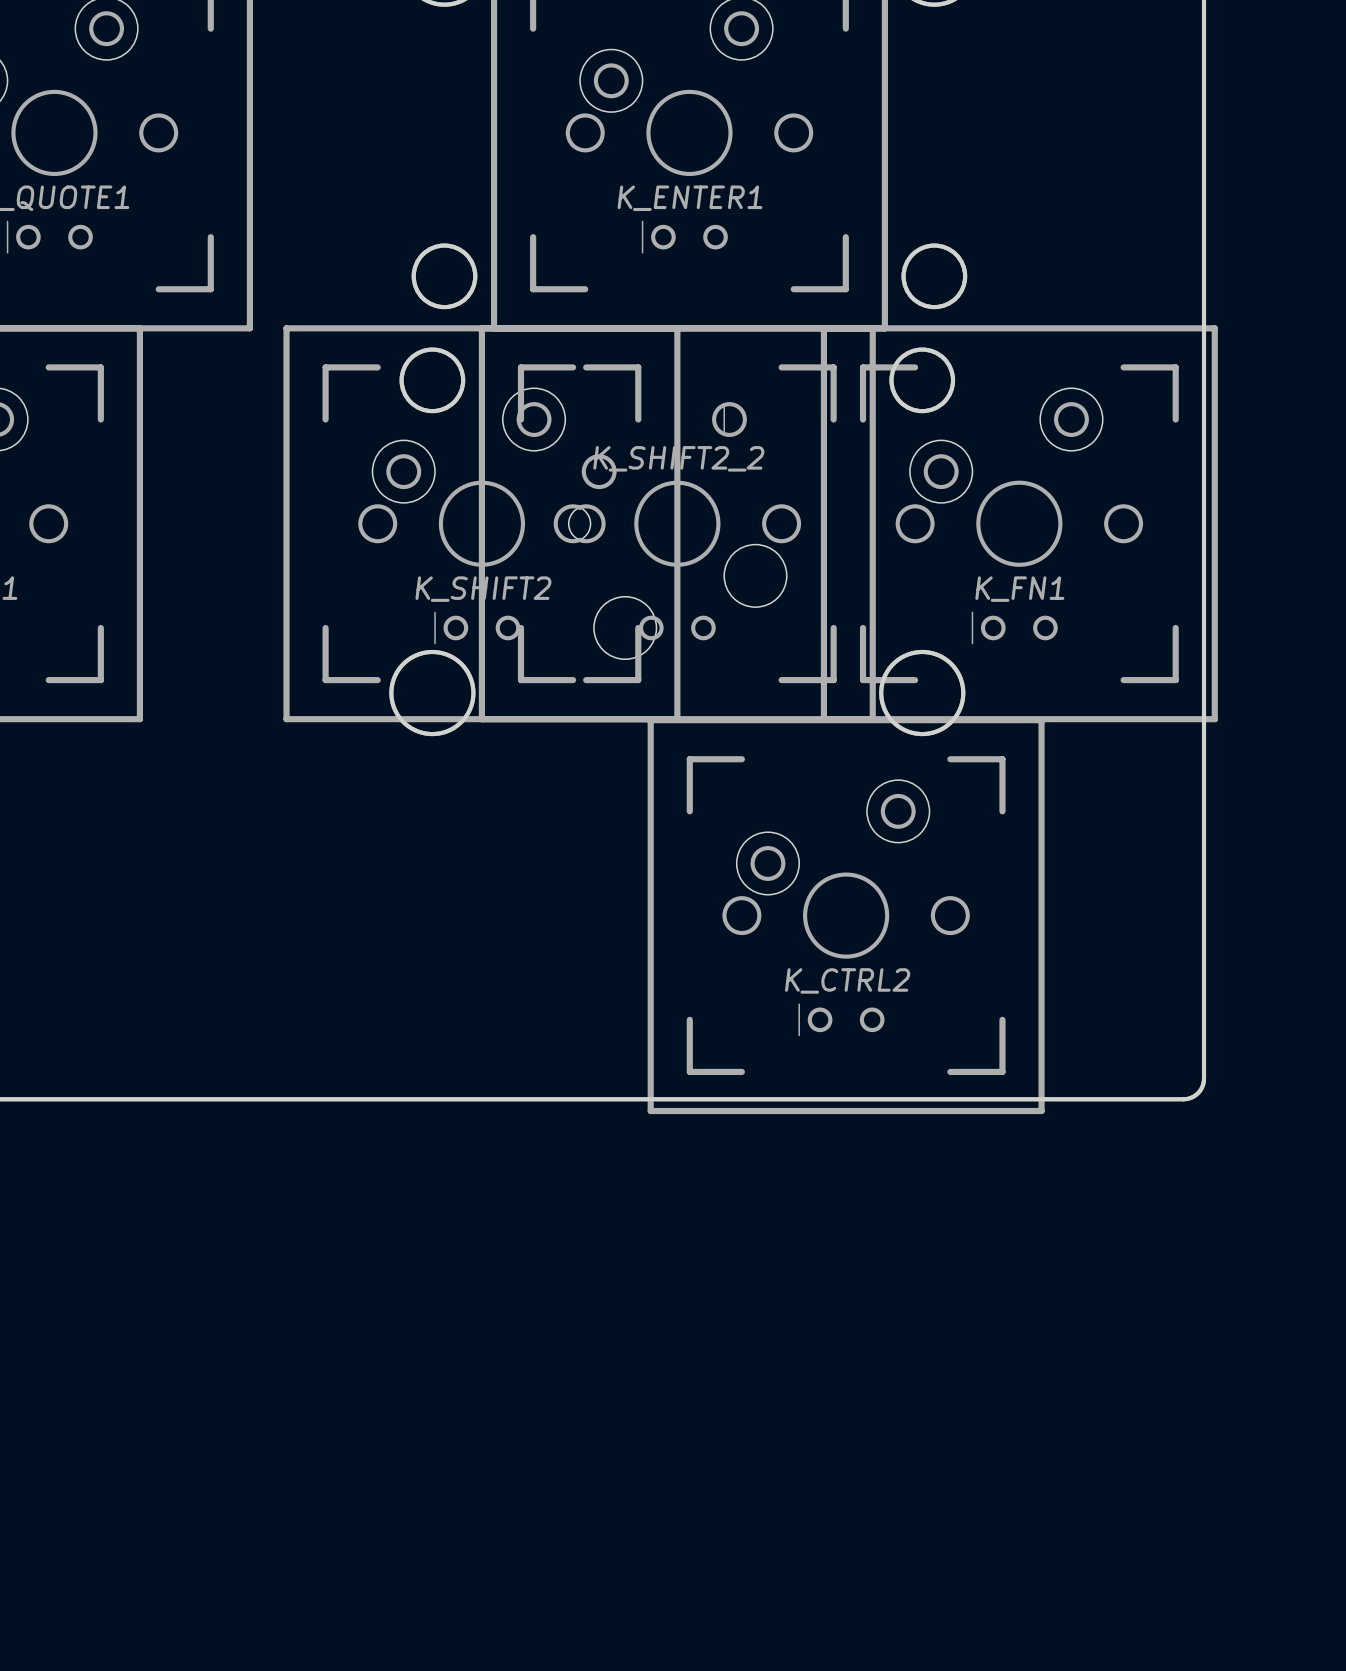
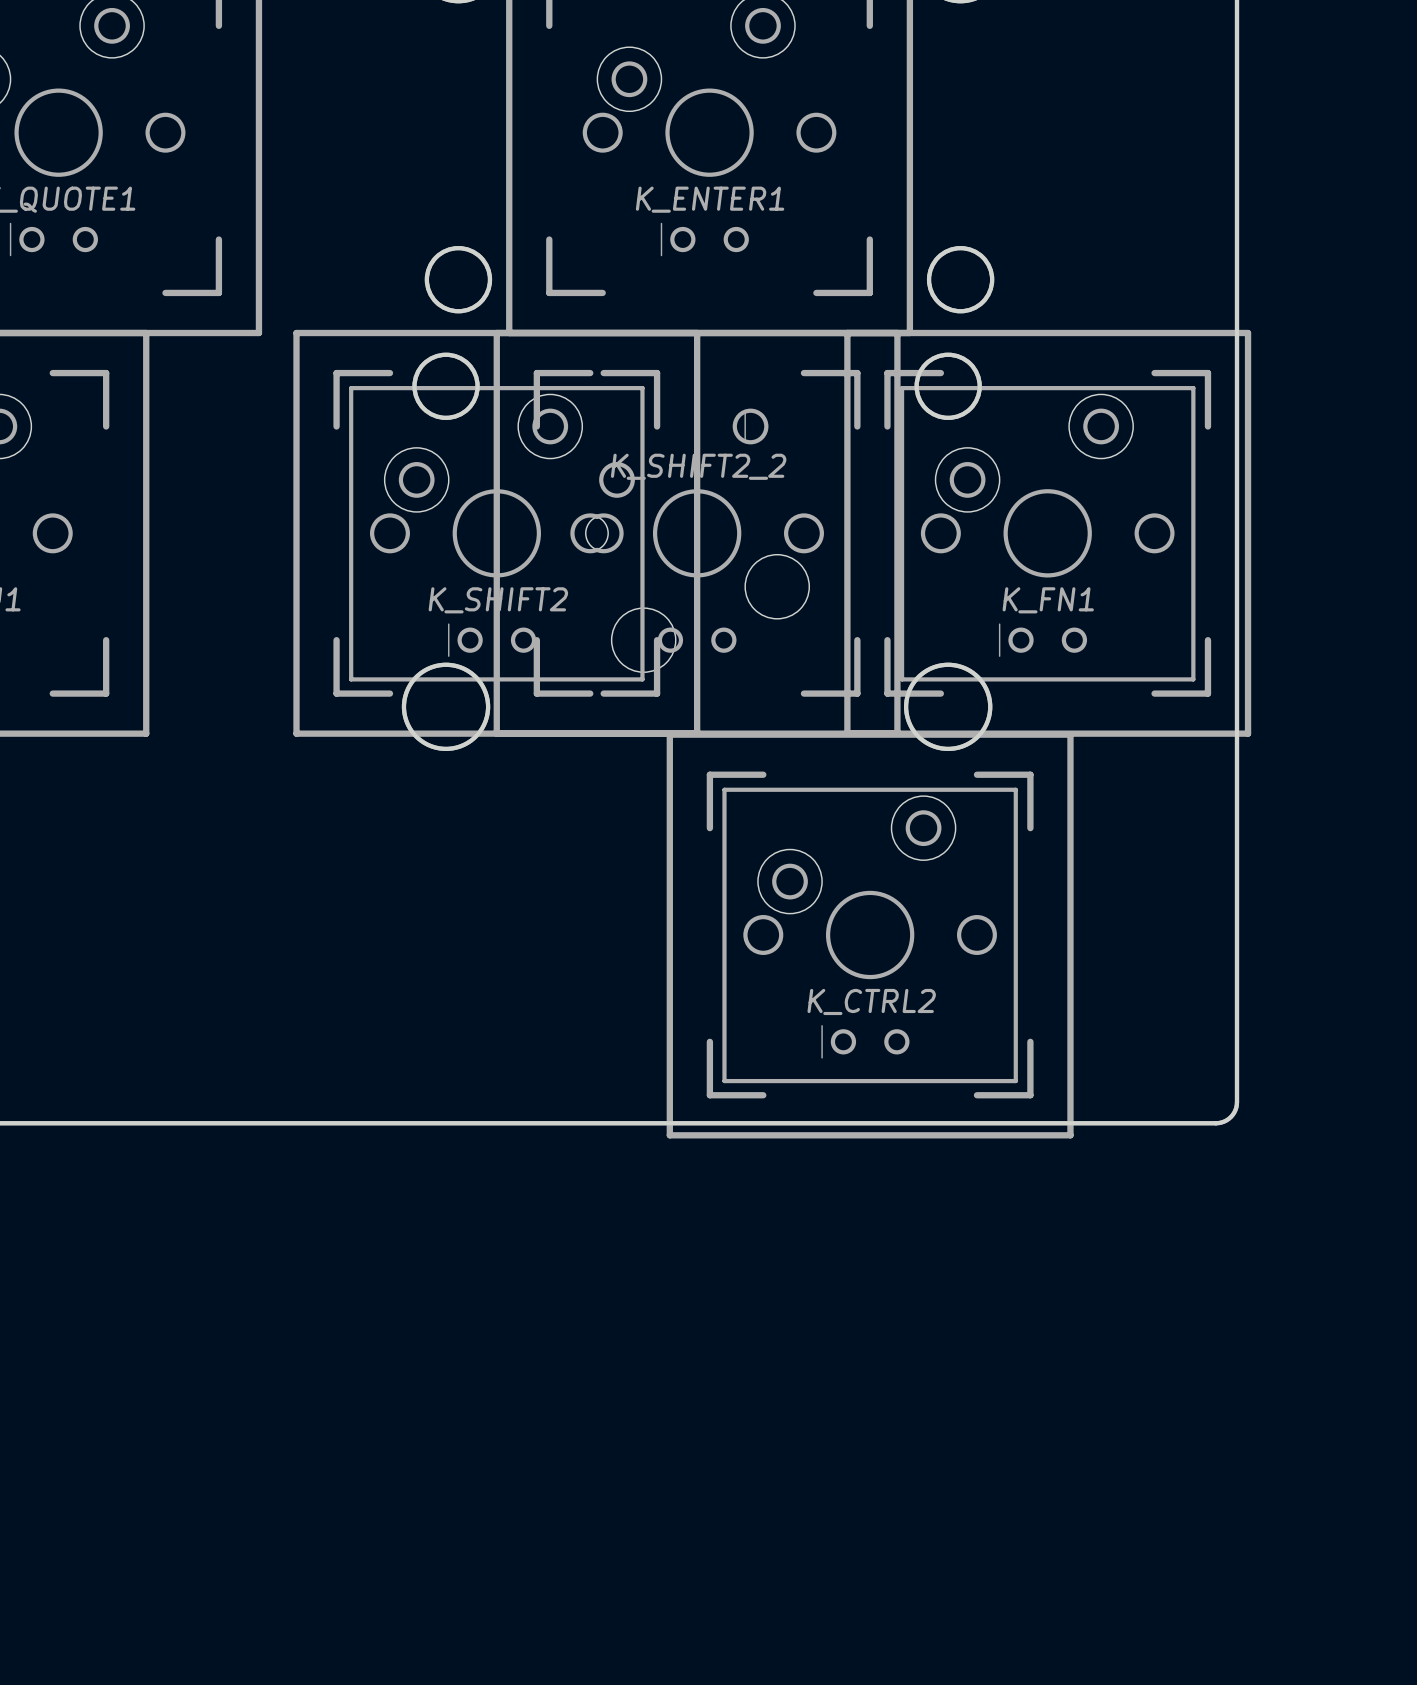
line: none -> (351, 388) (642, 388) (642, 679) (351, 679) (351, 388)
line: none -> (902, 388) (1193, 388) (1193, 679) (902, 679) (902, 388)
line: none -> (724, 789) (1015, 789) (1015, 1081) (724, 1081) (724, 789)

